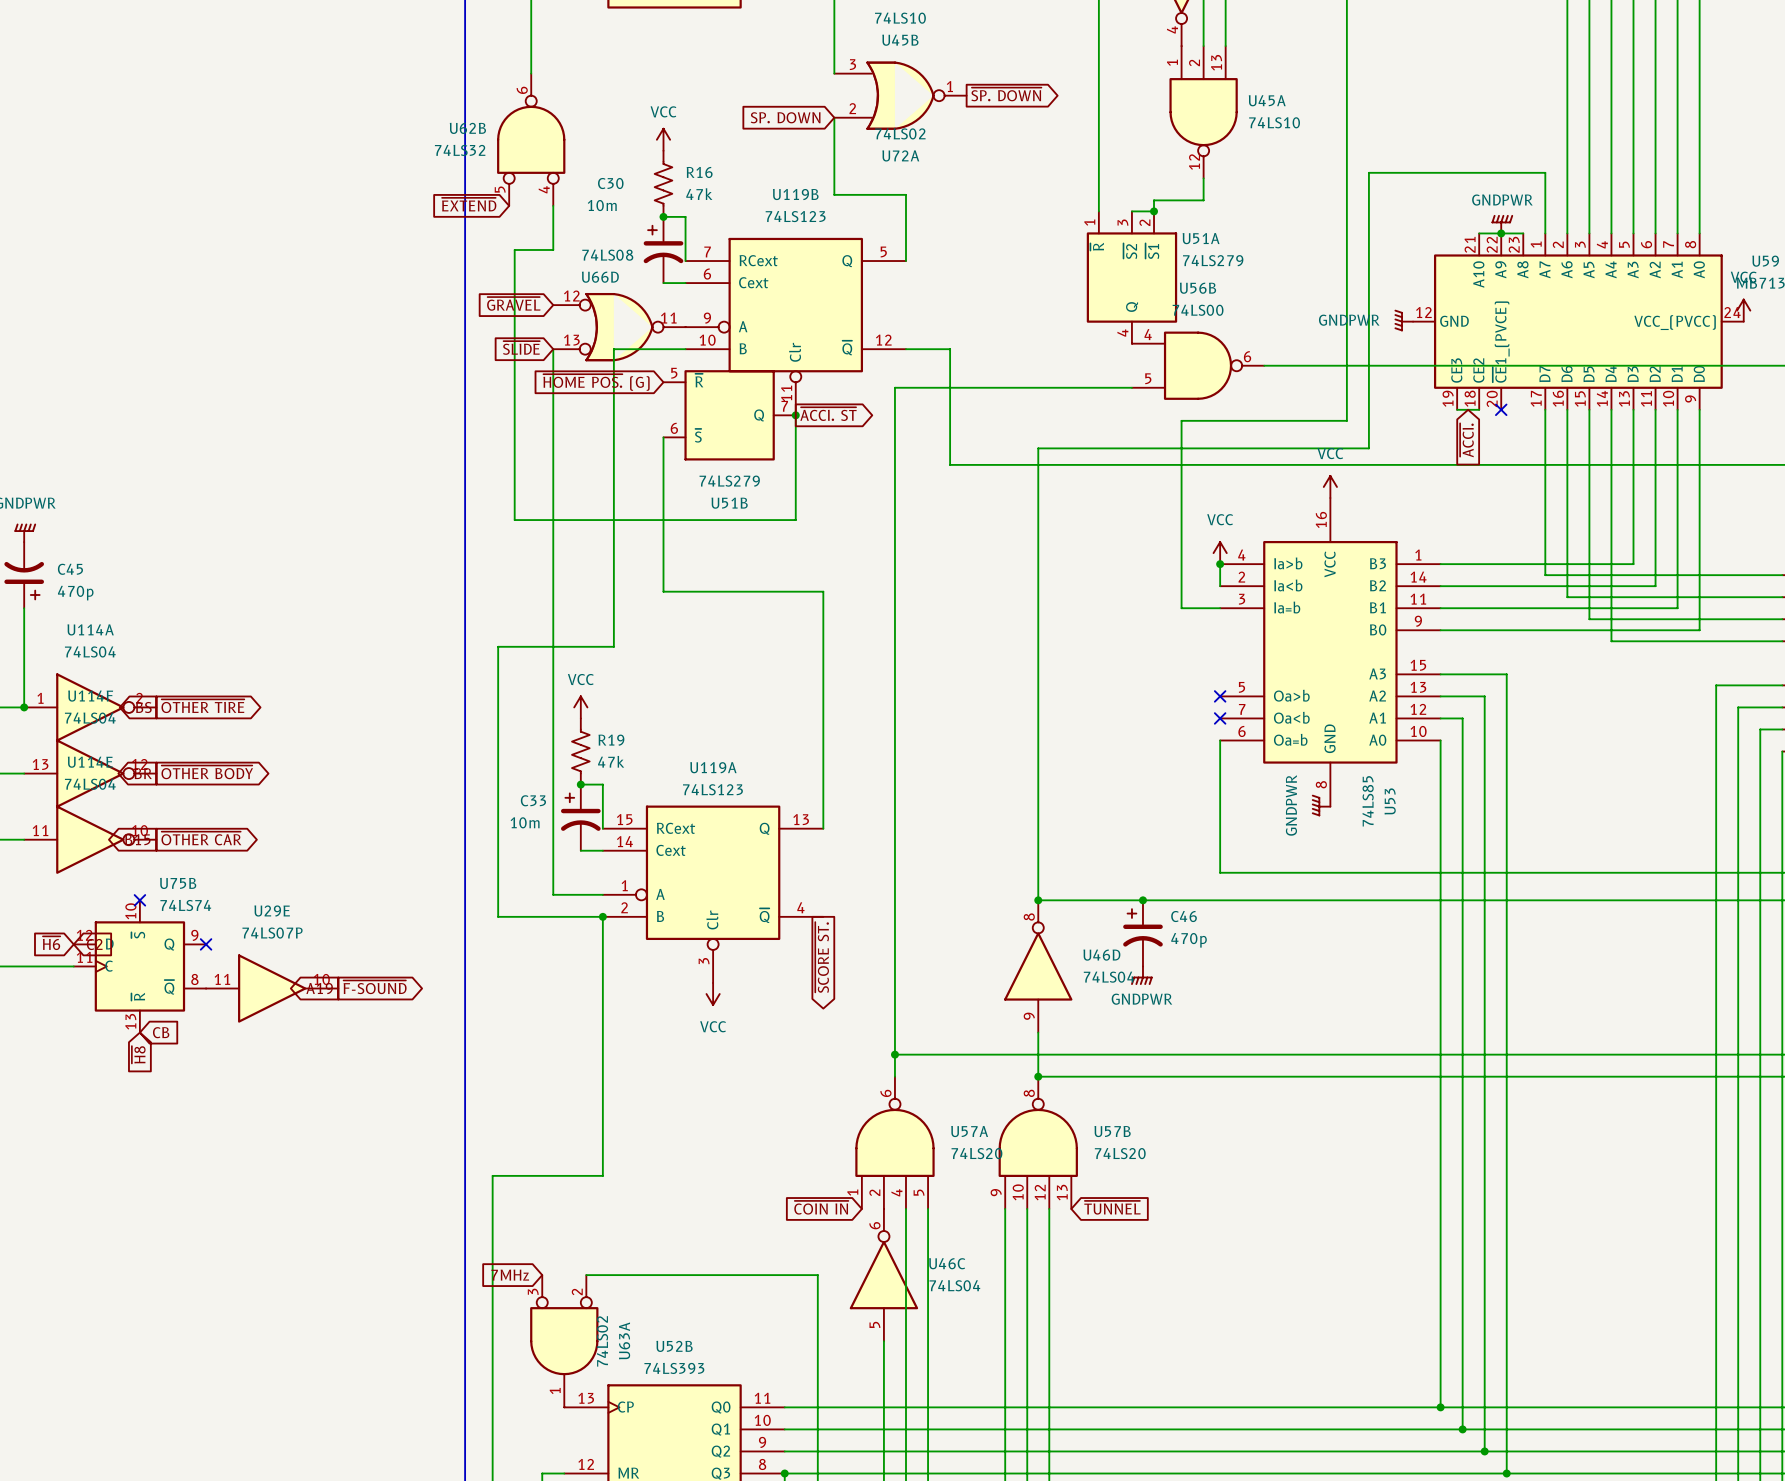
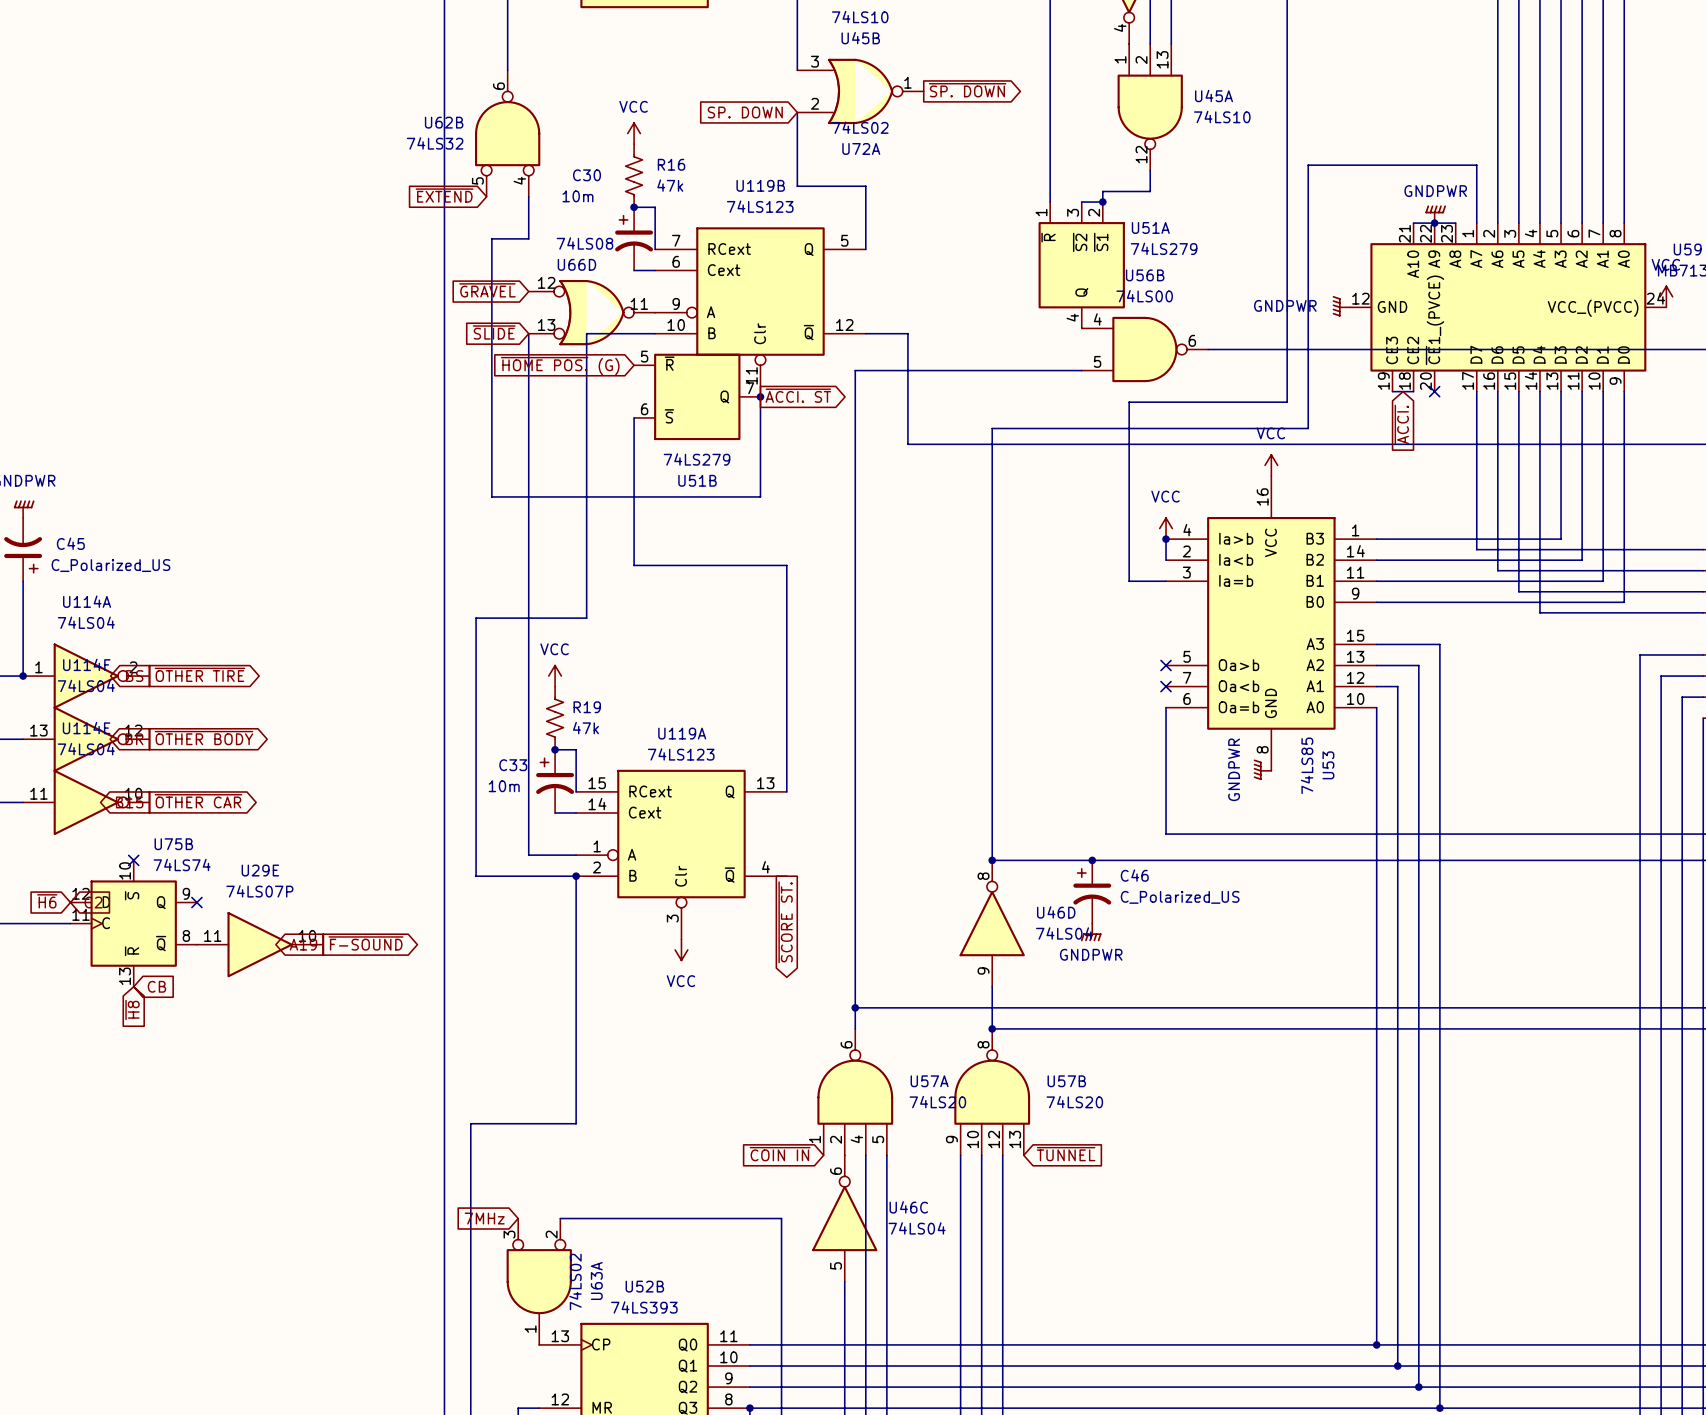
C45 value: 470p (75, 593) -> C_Polarized_US (110, 565)
C46 value: 470p (1189, 940) -> C_Polarized_US (1180, 897)

